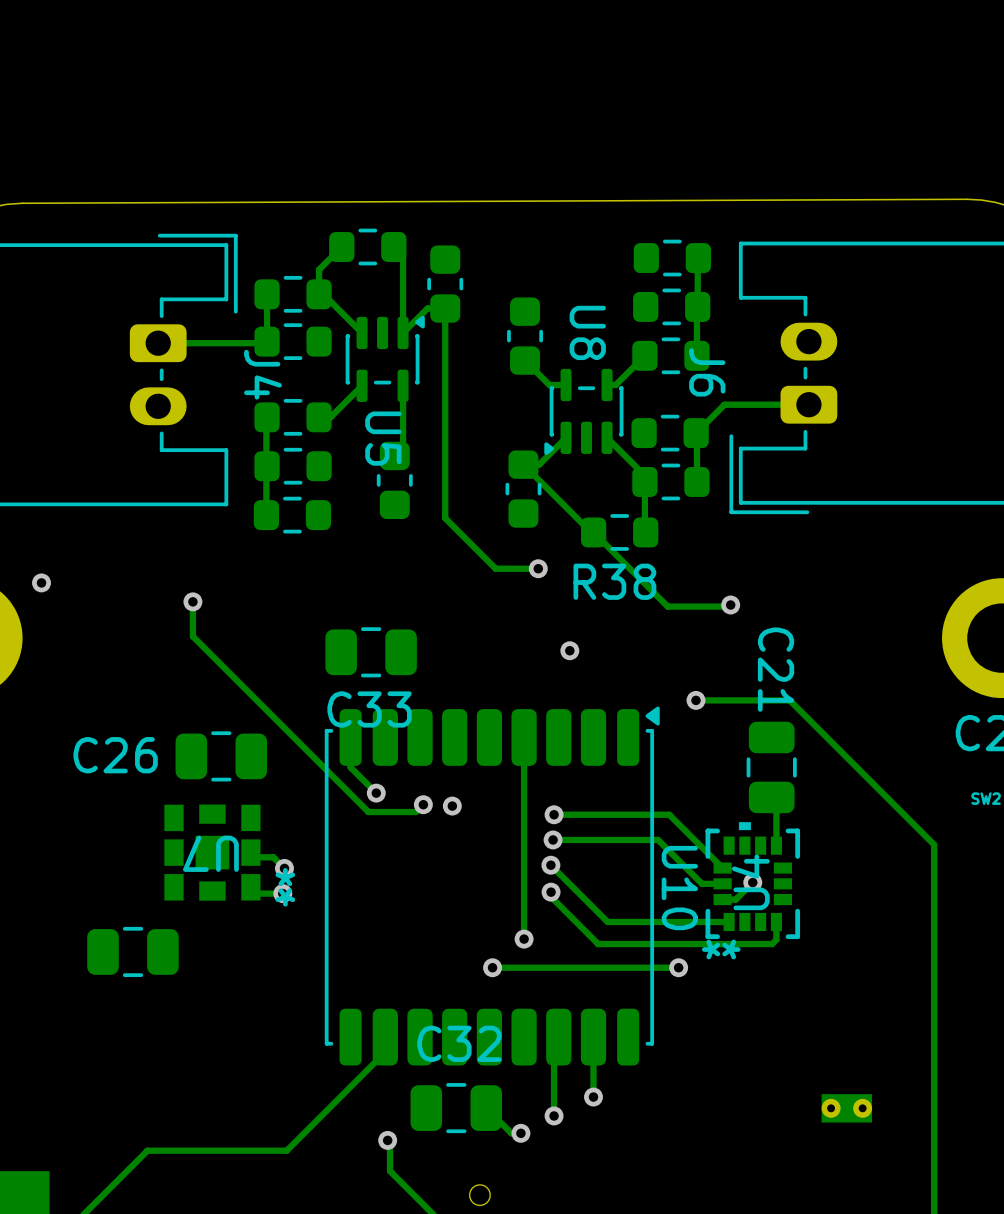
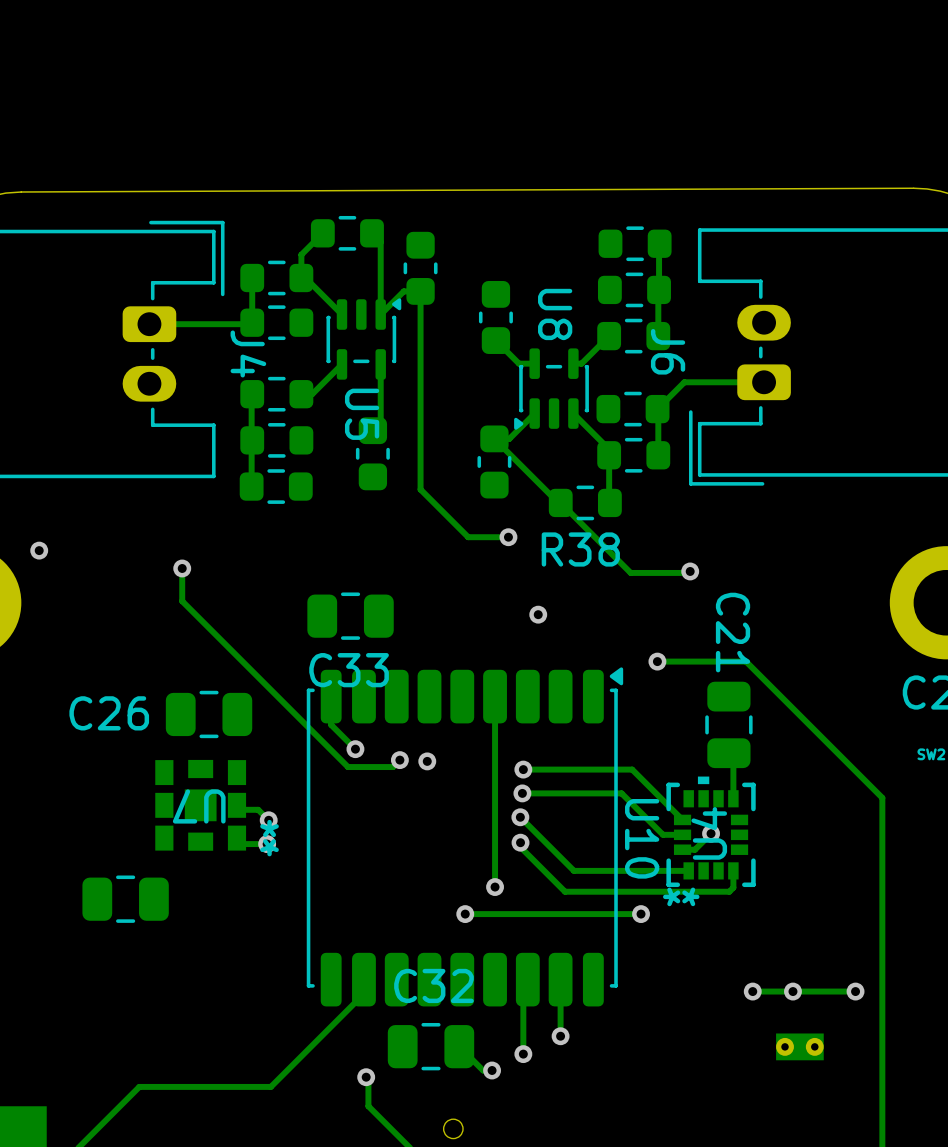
via: none -> (752, 991)
via: none -> (792, 991)
via: none -> (855, 991)
track: none -> (855, 996) (851, 991) (757, 991) (752, 996)

